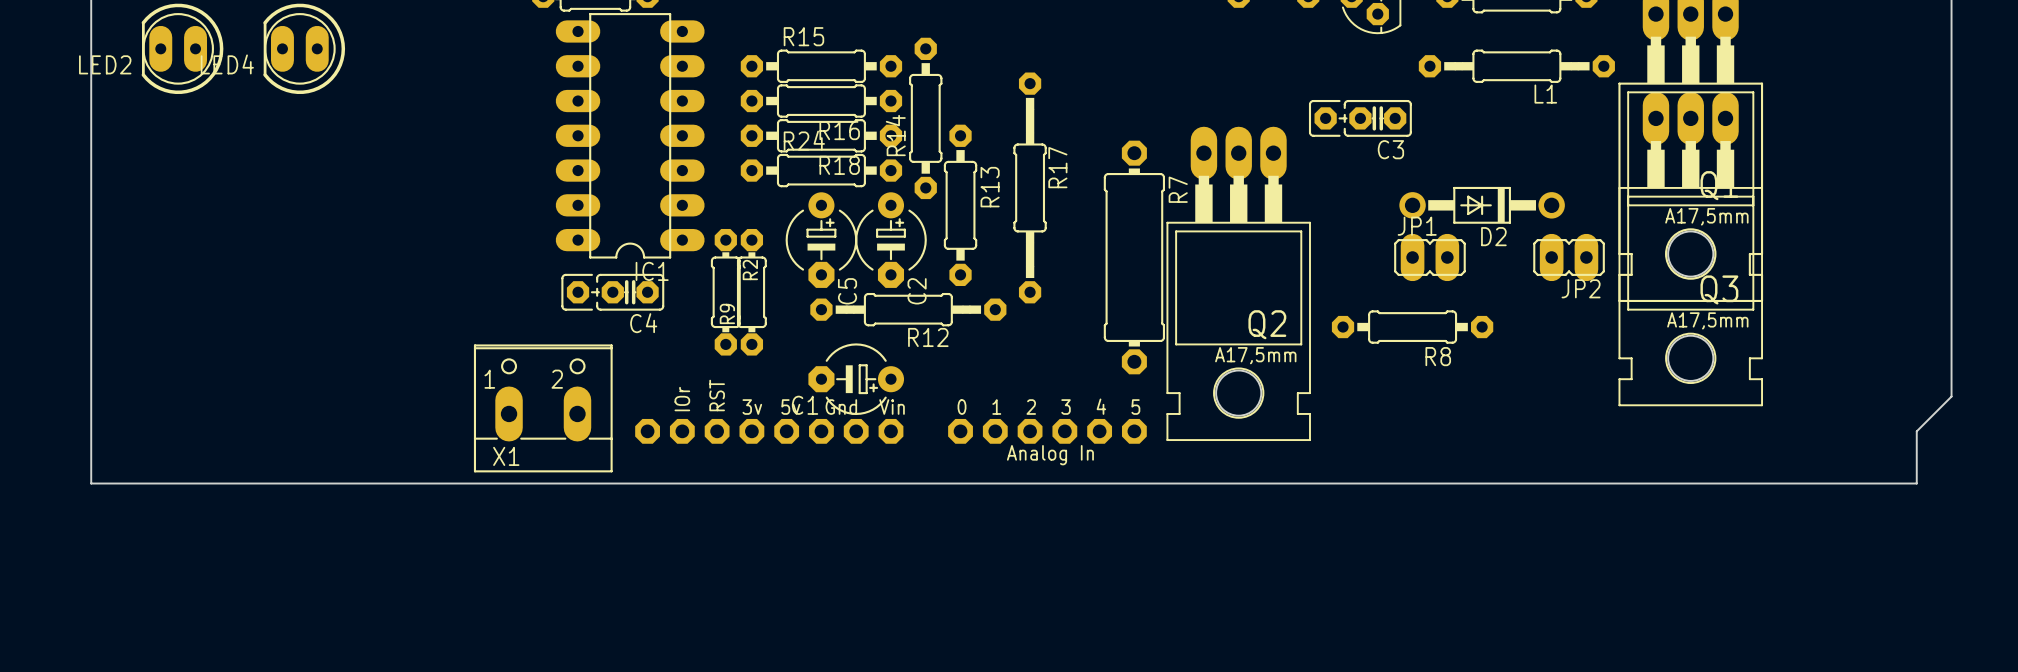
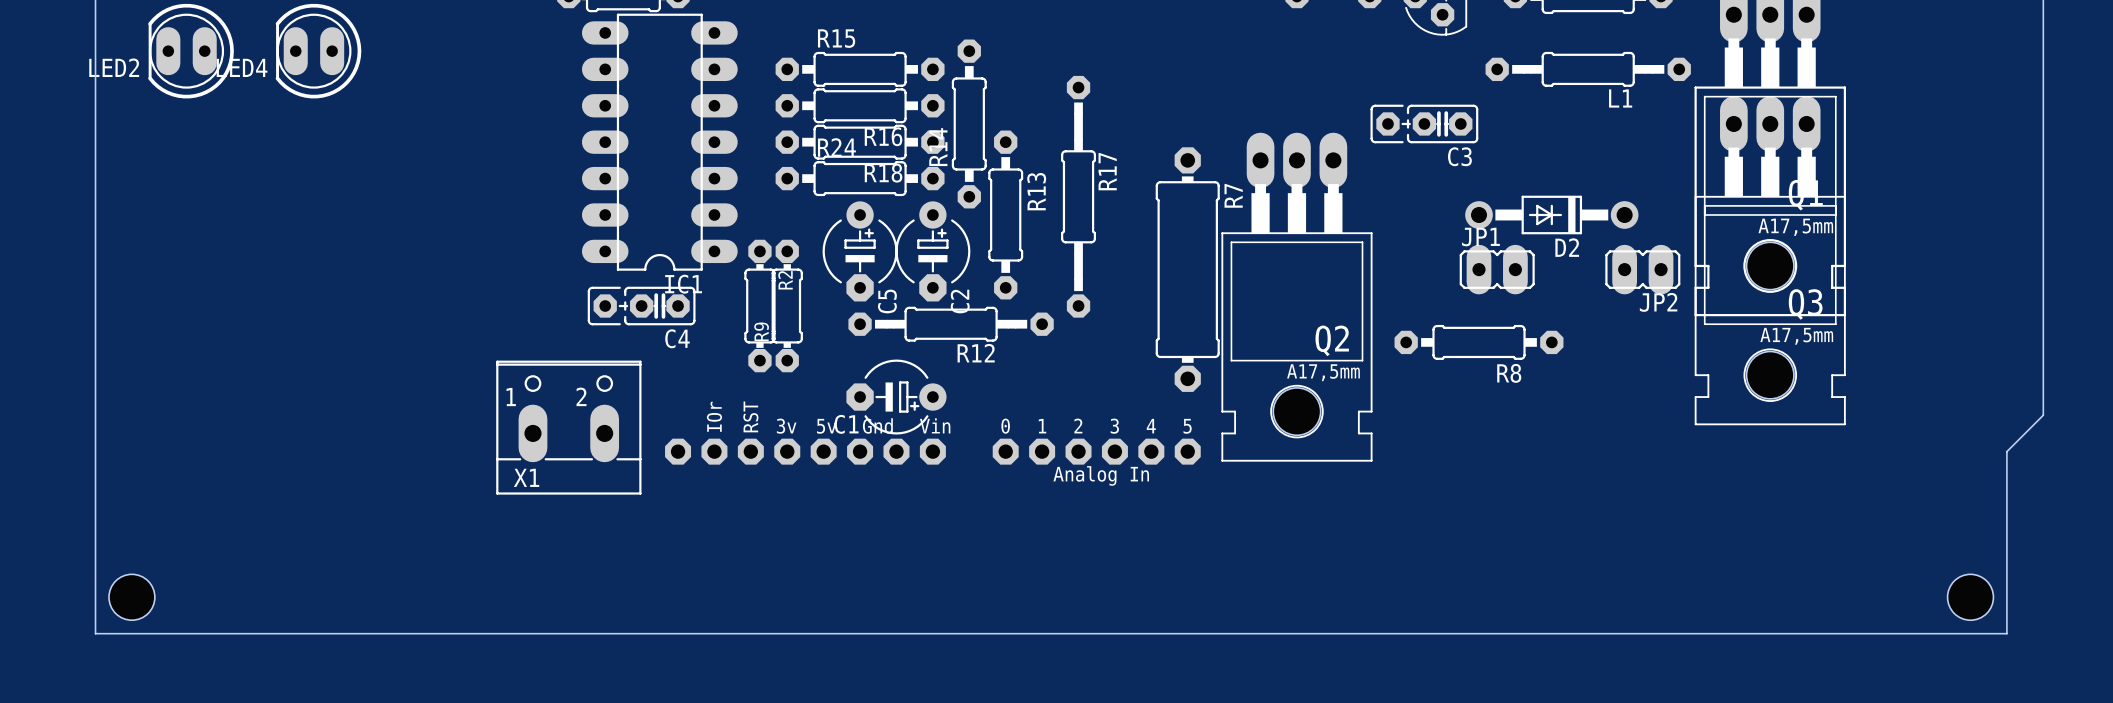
board edge: (91, 483) (1916, 483) -> (95, 506) (95, 633) (2006, 633) (2006, 506)
hole: none -> (131, 597)
hole: none -> (1970, 597)

